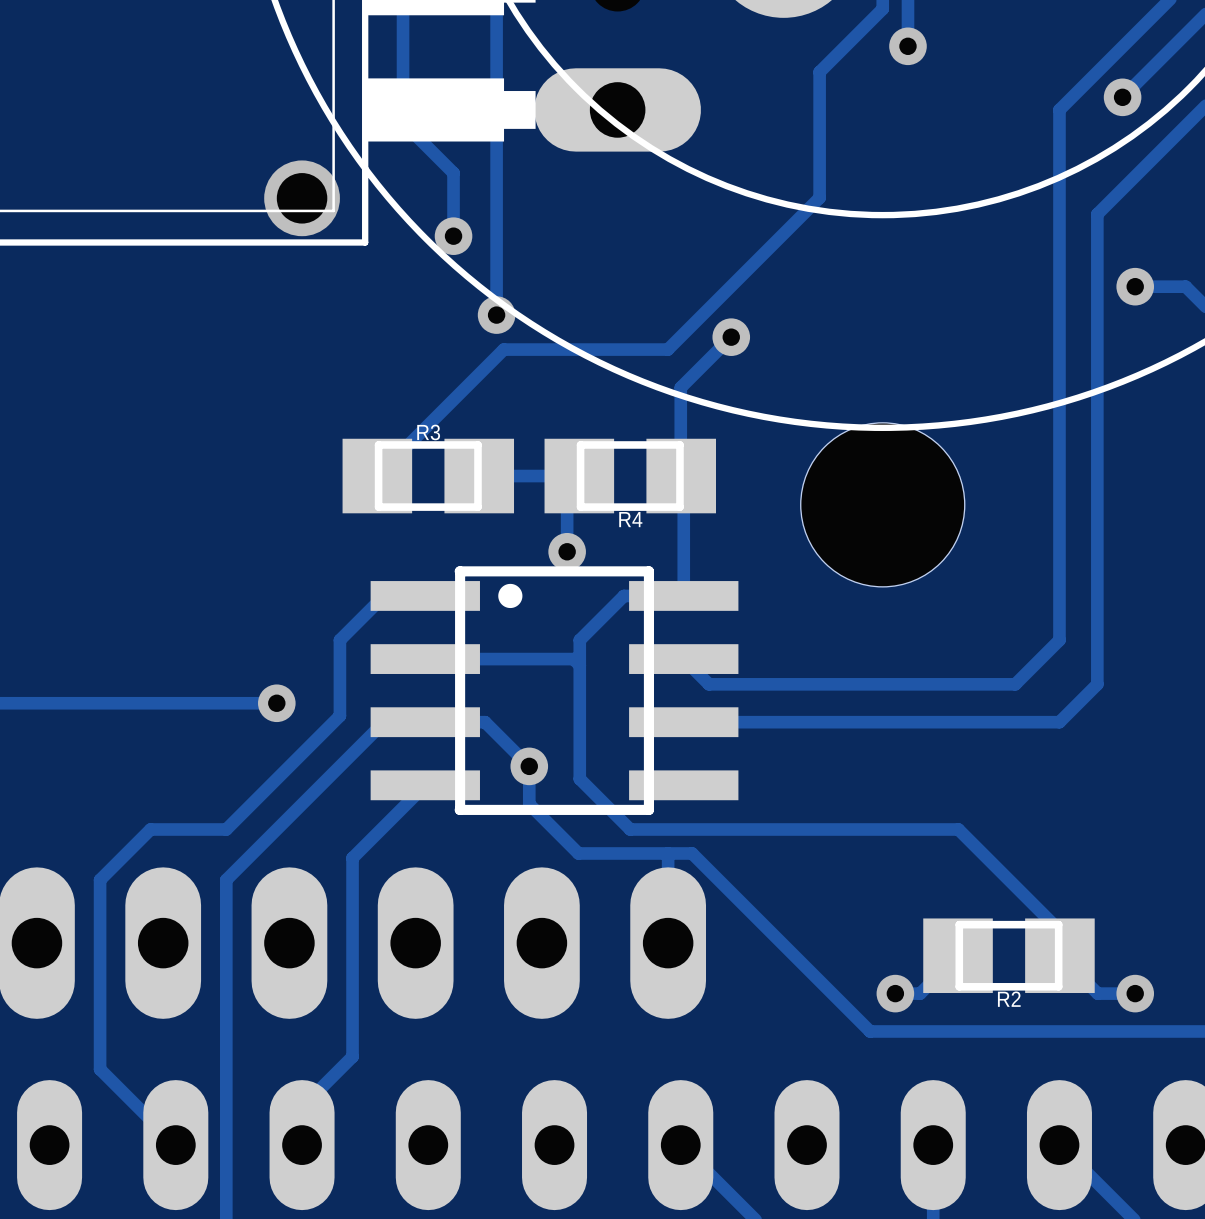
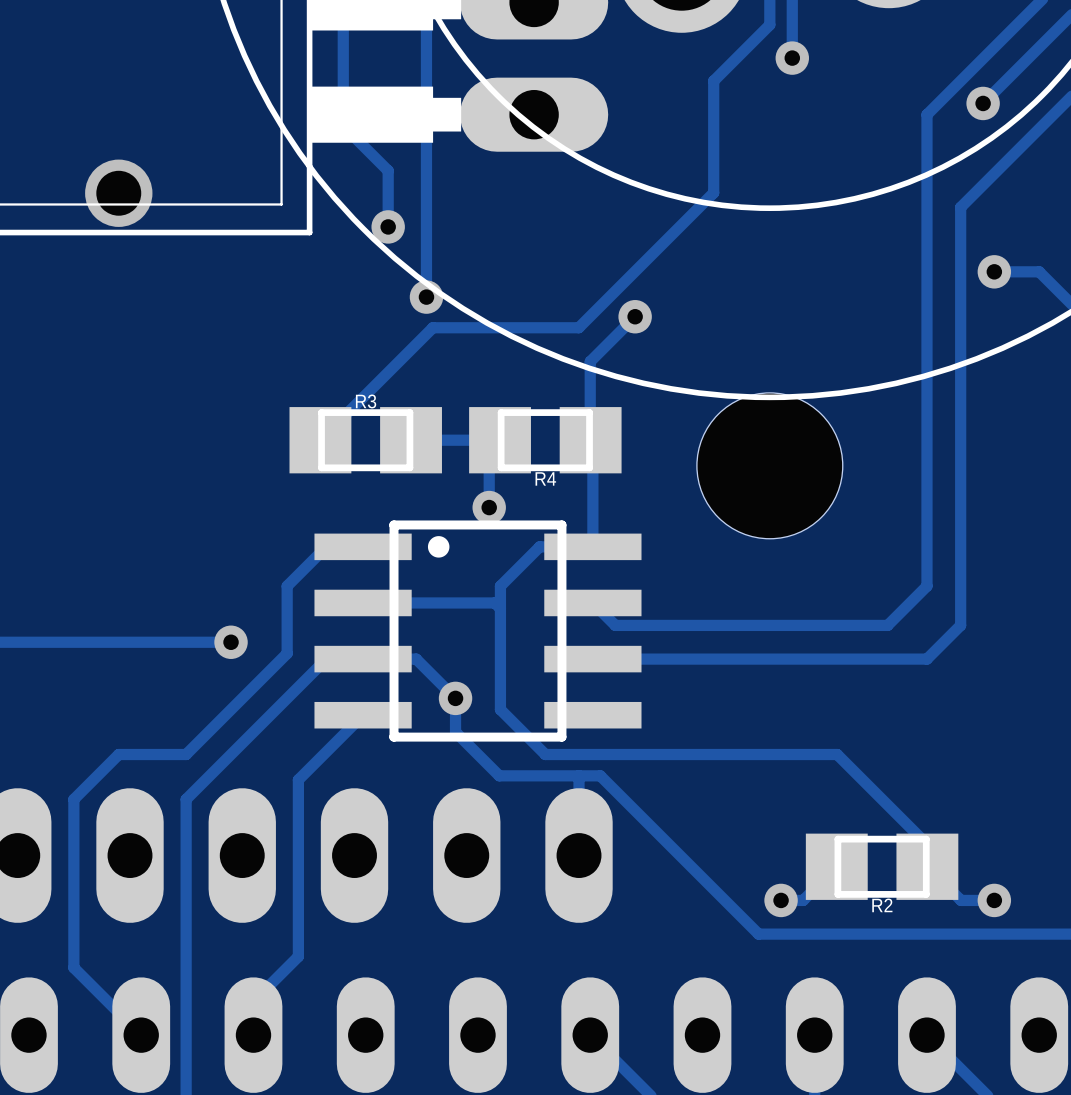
via: none -> (118, 193)
via: (302, 198) -> none

